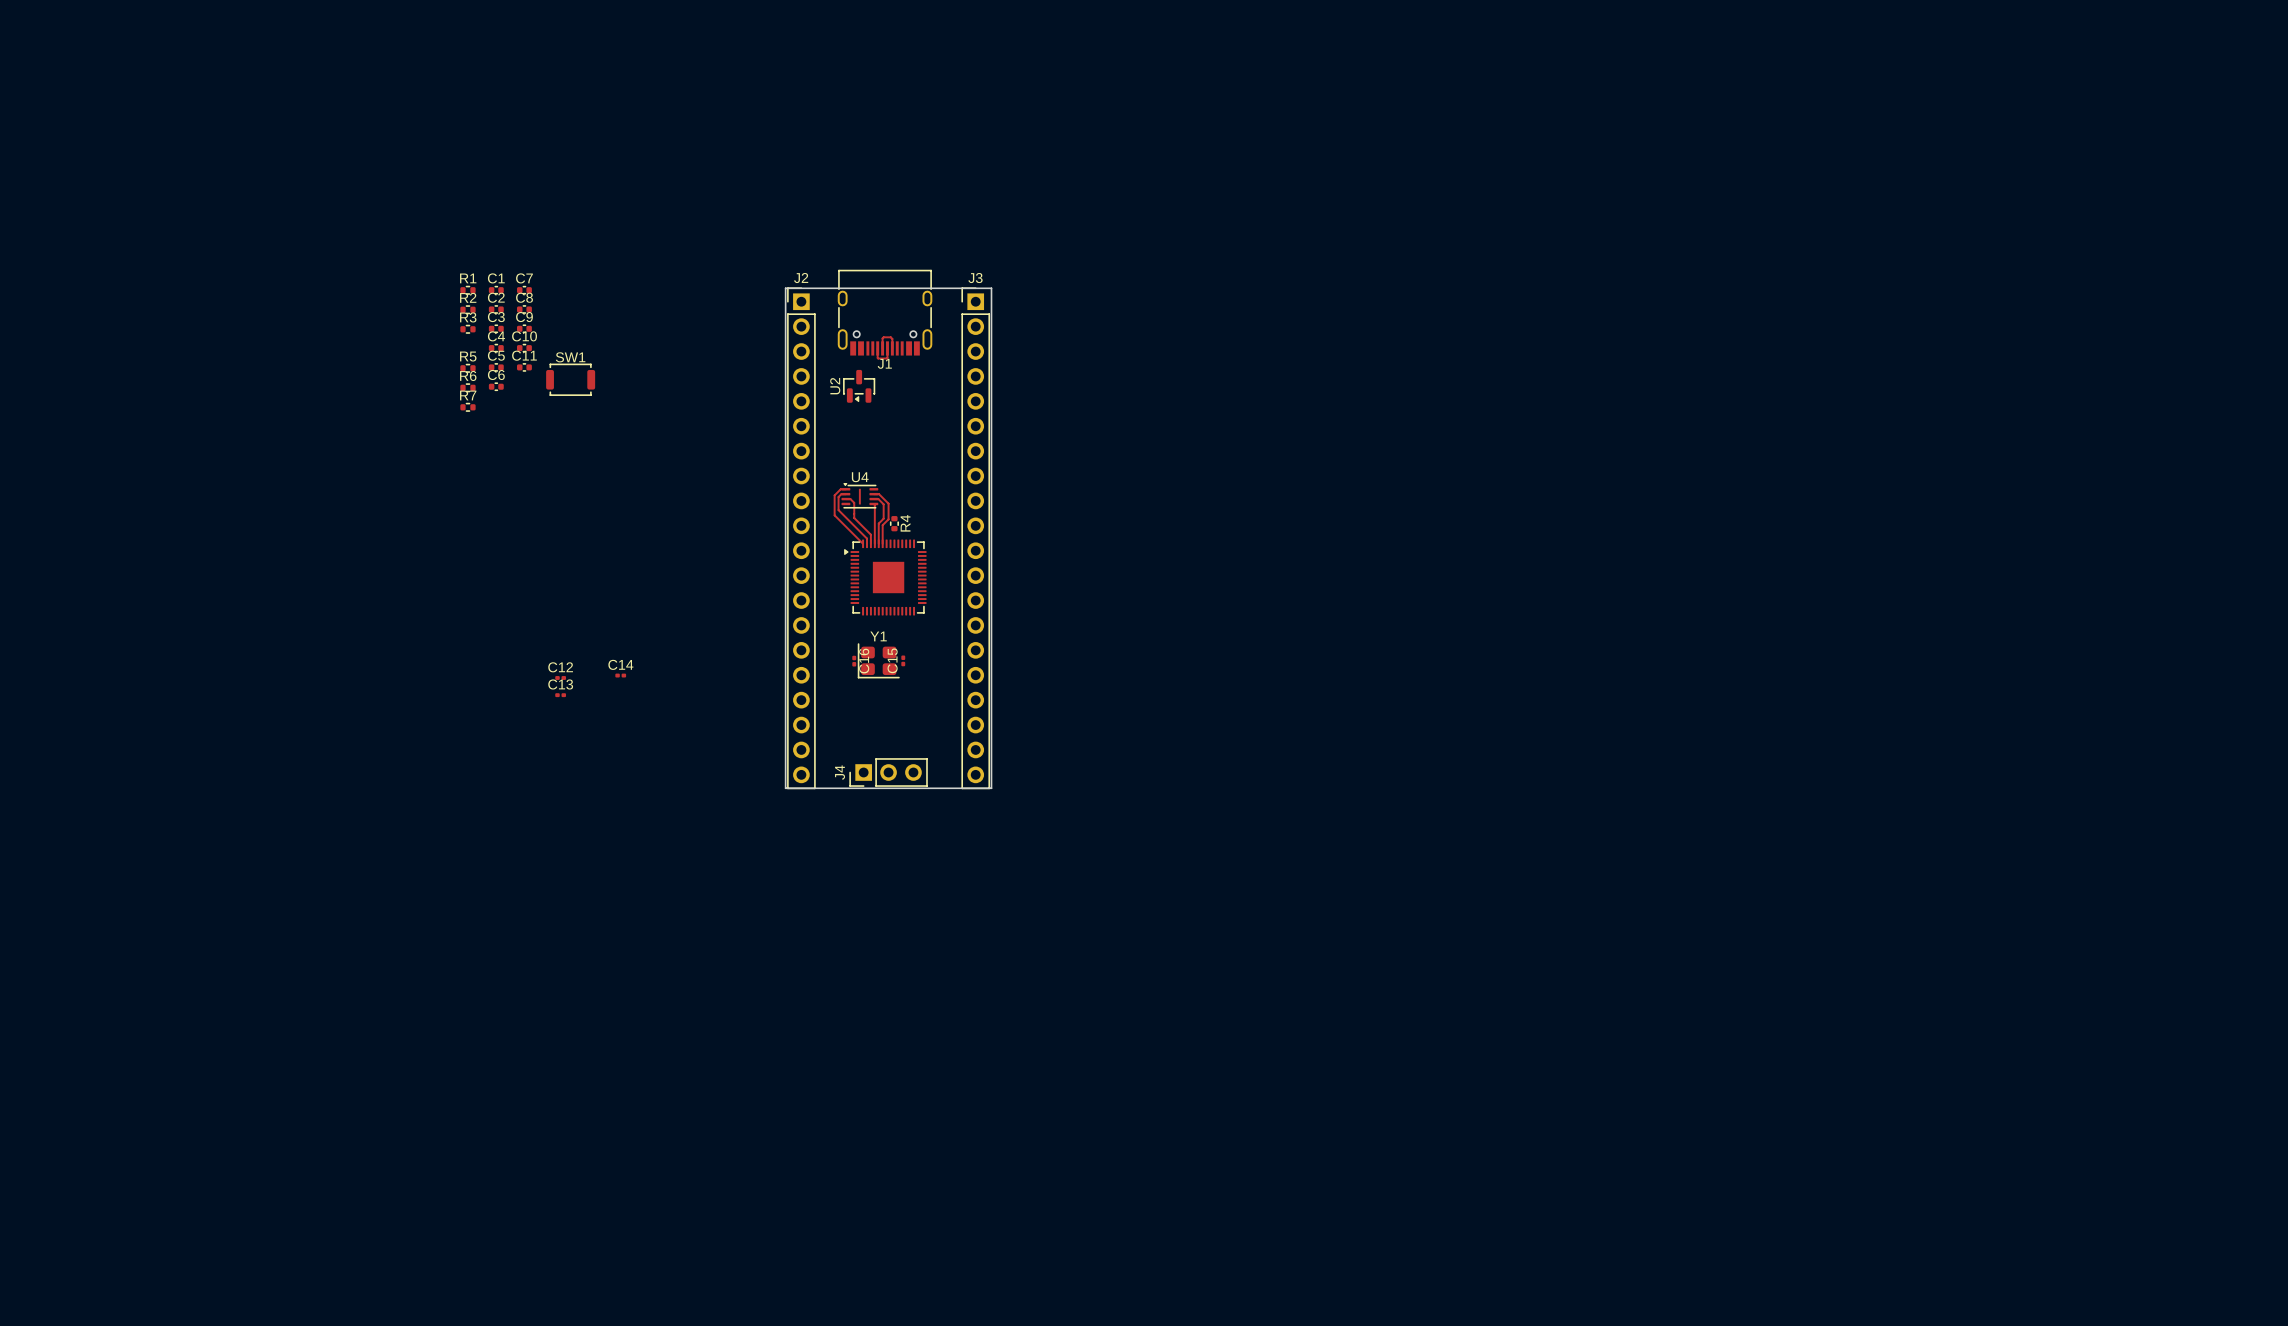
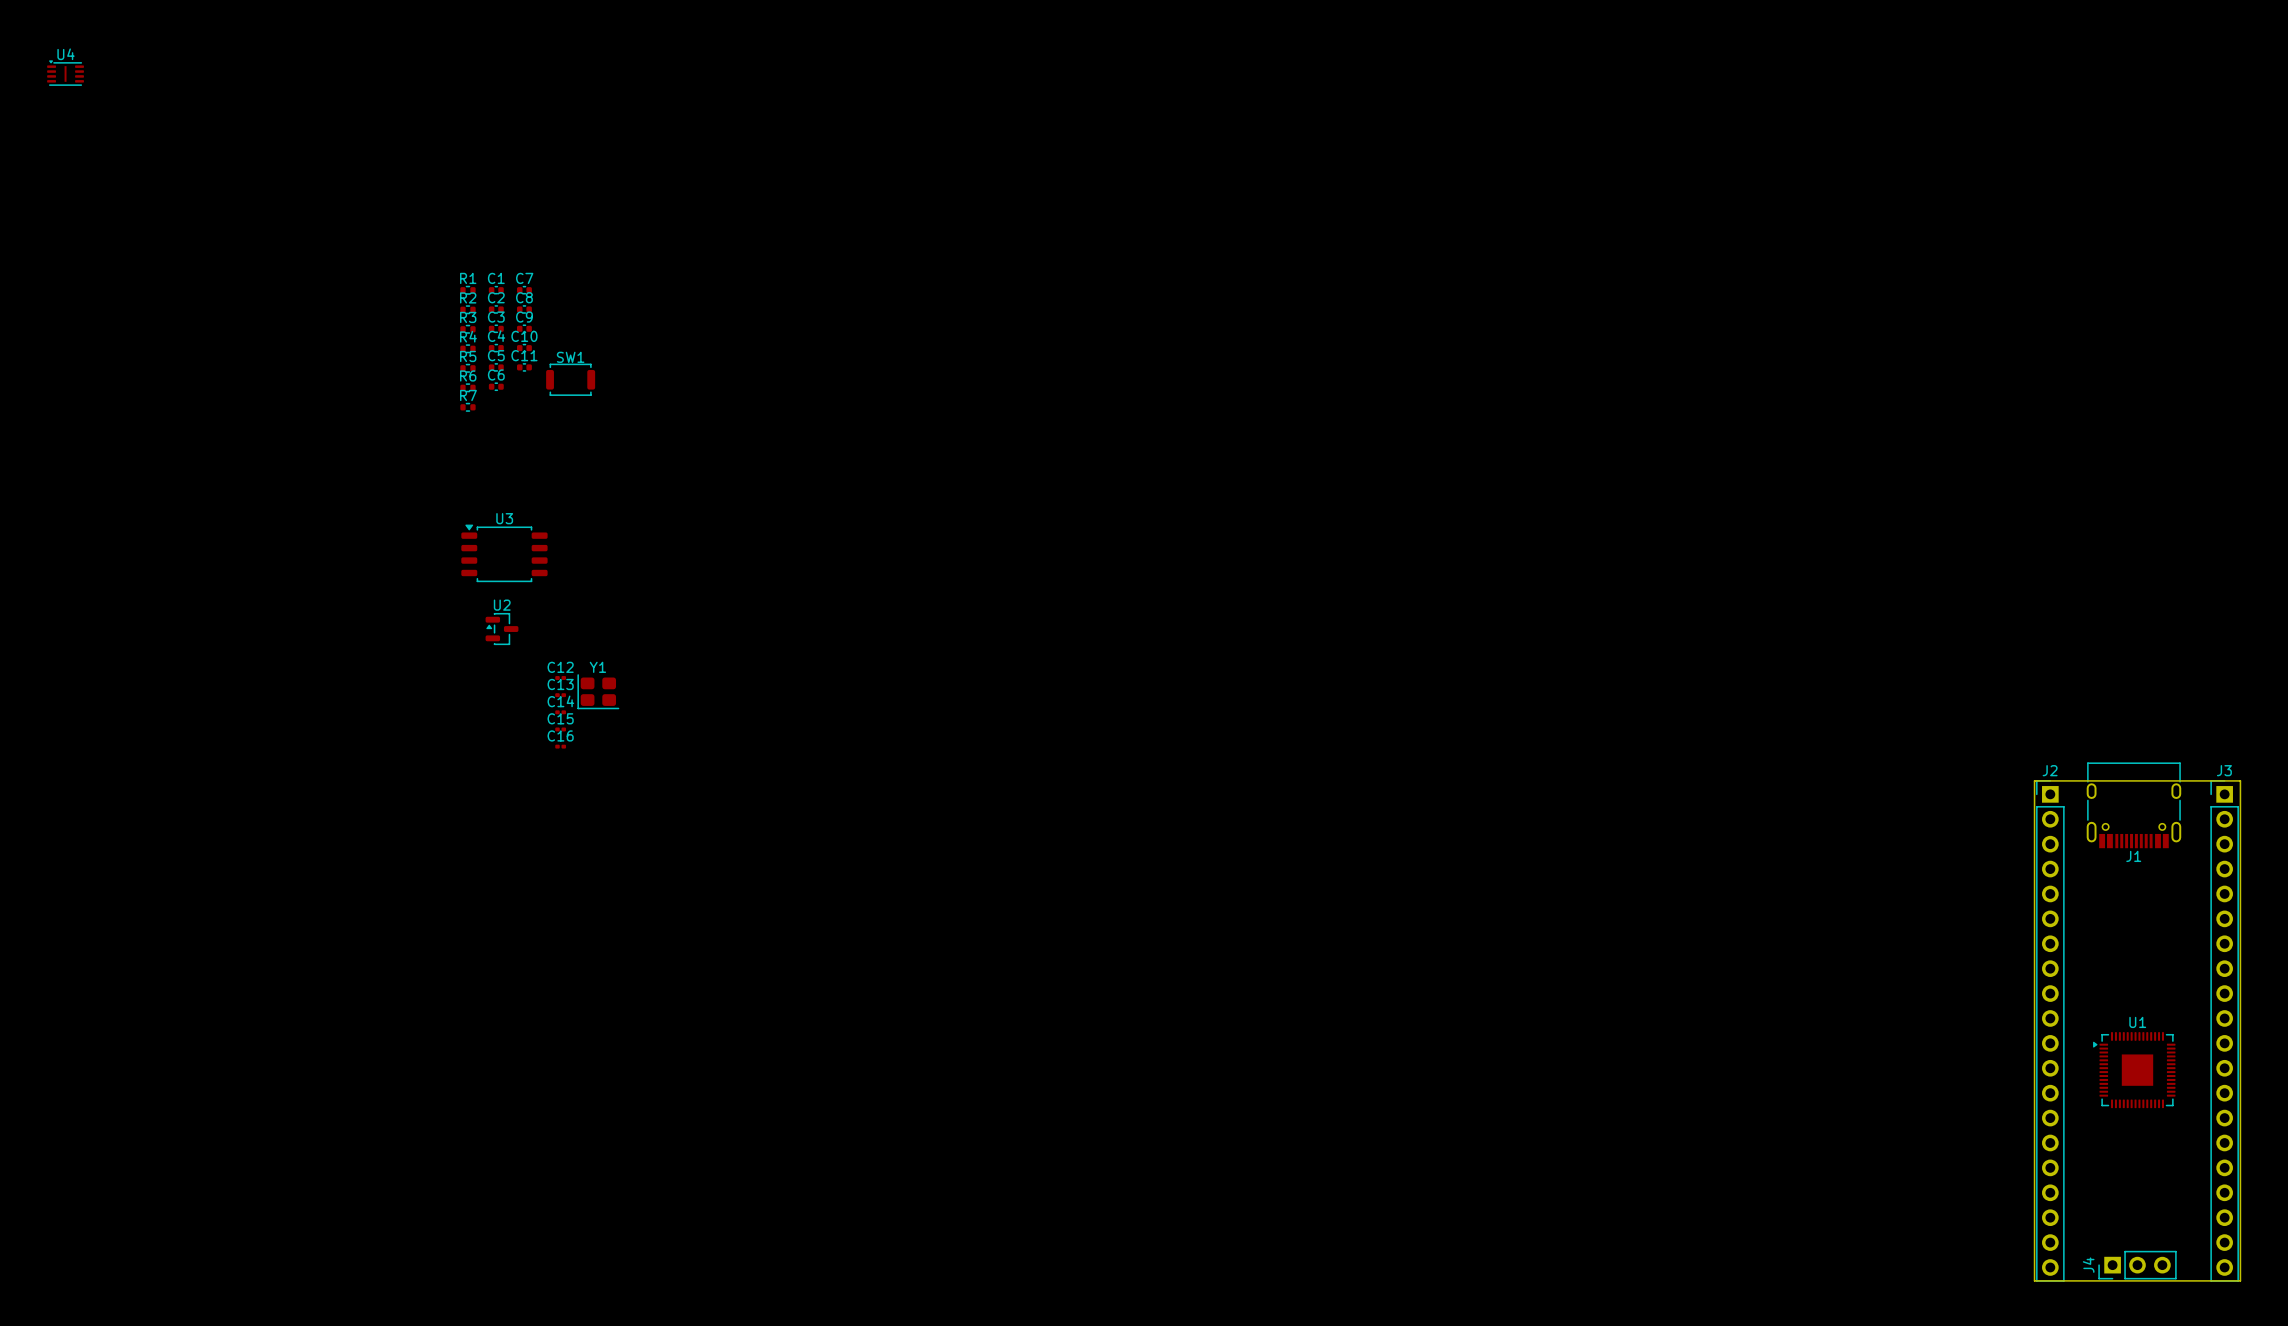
board edge: (785, 288) (991, 288) (991, 788) (785, 788) (785, 288) -> none
J1 position: (885, 312) -> (2133, 805)
top track: (877, 348) (878, 358) (887, 358) (887, 348) -> none
top track: (882, 348) (883, 337) (892, 338) (892, 348) -> none
U2 rotation: 0° (859, 386) -> 90° clockwise (502, 629)
U2 position: (859, 386) -> (502, 629)
top track: (845, 489) (840, 489) (834, 495) (834, 515) (863, 543) -> none
top track: (845, 494) (841, 494) (838, 496) (838, 510) (866, 538) (866, 543) -> none
top track: (873, 494) (879, 494) (888, 503) (888, 519) (882, 525) (882, 543) -> none
U4 position: (859, 495) -> (65, 73)
top track: (845, 499) (850, 499) (854, 502) (854, 518) (870, 534) (870, 543) -> none
top track: (873, 499) (878, 499) (883, 504) (883, 518) (878, 523) (878, 543) -> none
top track: (873, 503) (874, 543) -> none
R4 rotation: 0° (894, 523) -> 90° clockwise (467, 348)
R4 position: (894, 523) -> (467, 348)
J2 position: (801, 538) -> (2050, 1030)
J3 position: (975, 538) -> (2224, 1030)
U3: none -> (504, 553)
part: (885, 577) -> none
Y1 position: (878, 660) -> (598, 691)
C15 rotation: 0° (903, 660) -> 90° clockwise (560, 729)
C15 position: (903, 660) -> (560, 729)
C16 rotation: 0° (854, 661) -> 90° clockwise (560, 746)
C16 position: (854, 661) -> (560, 746)
C14 position: (620, 675) -> (560, 712)
J4 position: (888, 772) -> (2137, 1265)
board edge: none -> (2034, 780) (2240, 780) (2240, 1280) (2034, 1280) (2034, 780)
U1: none -> (2134, 1070)

